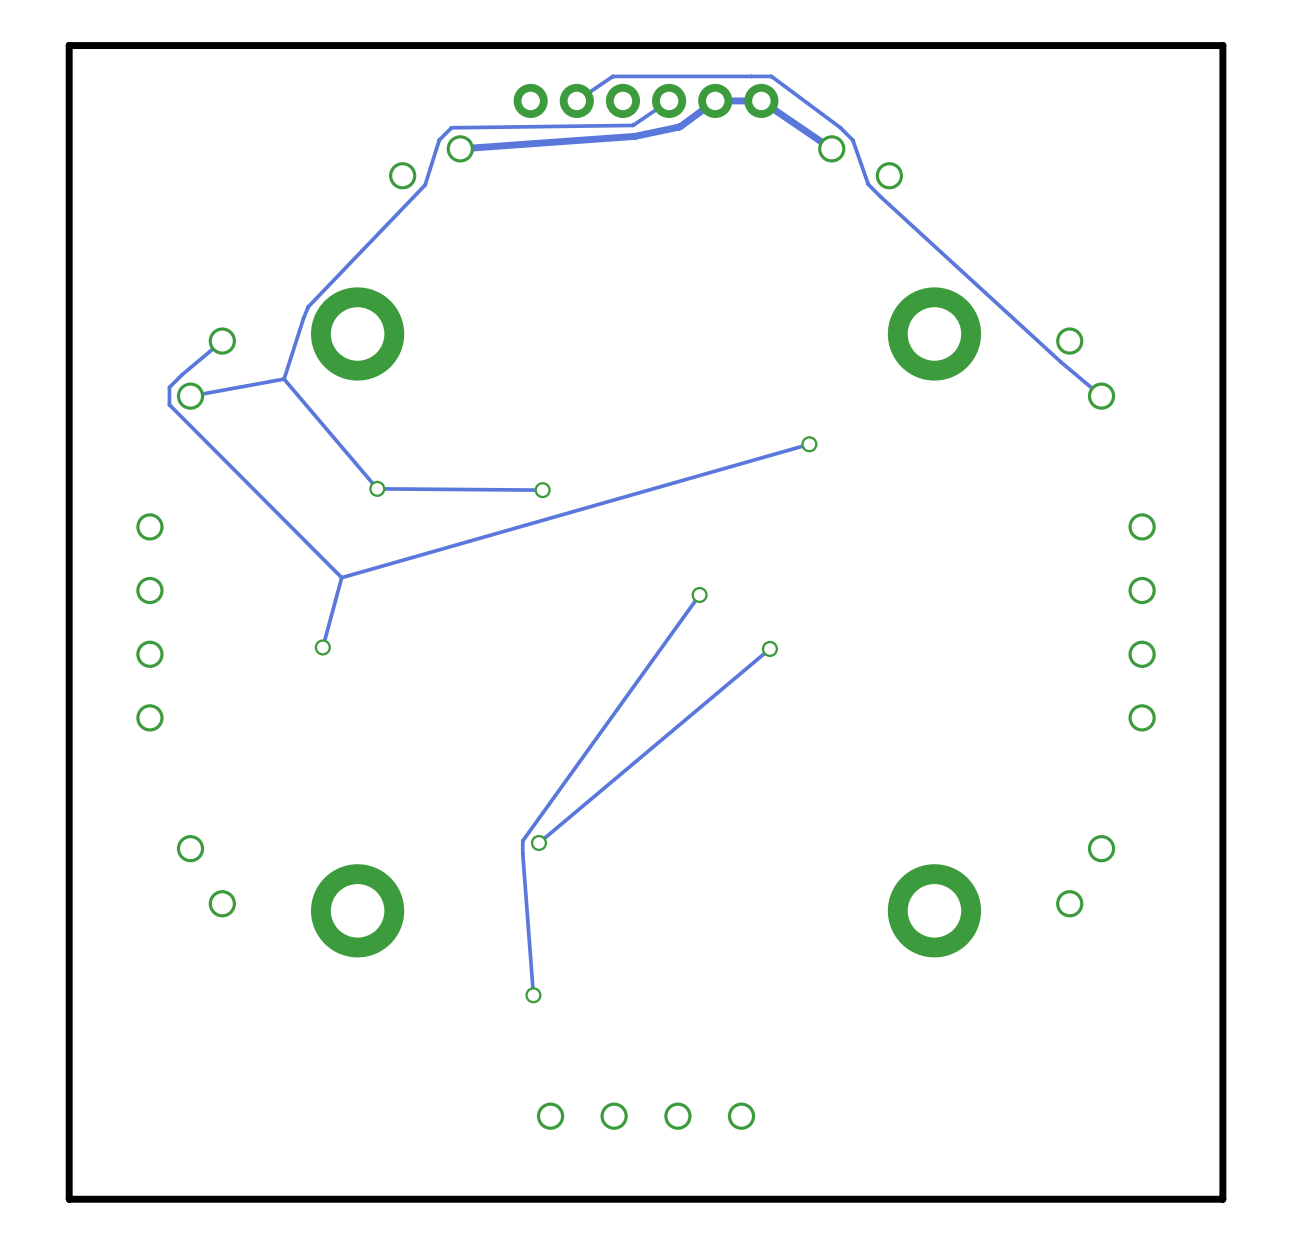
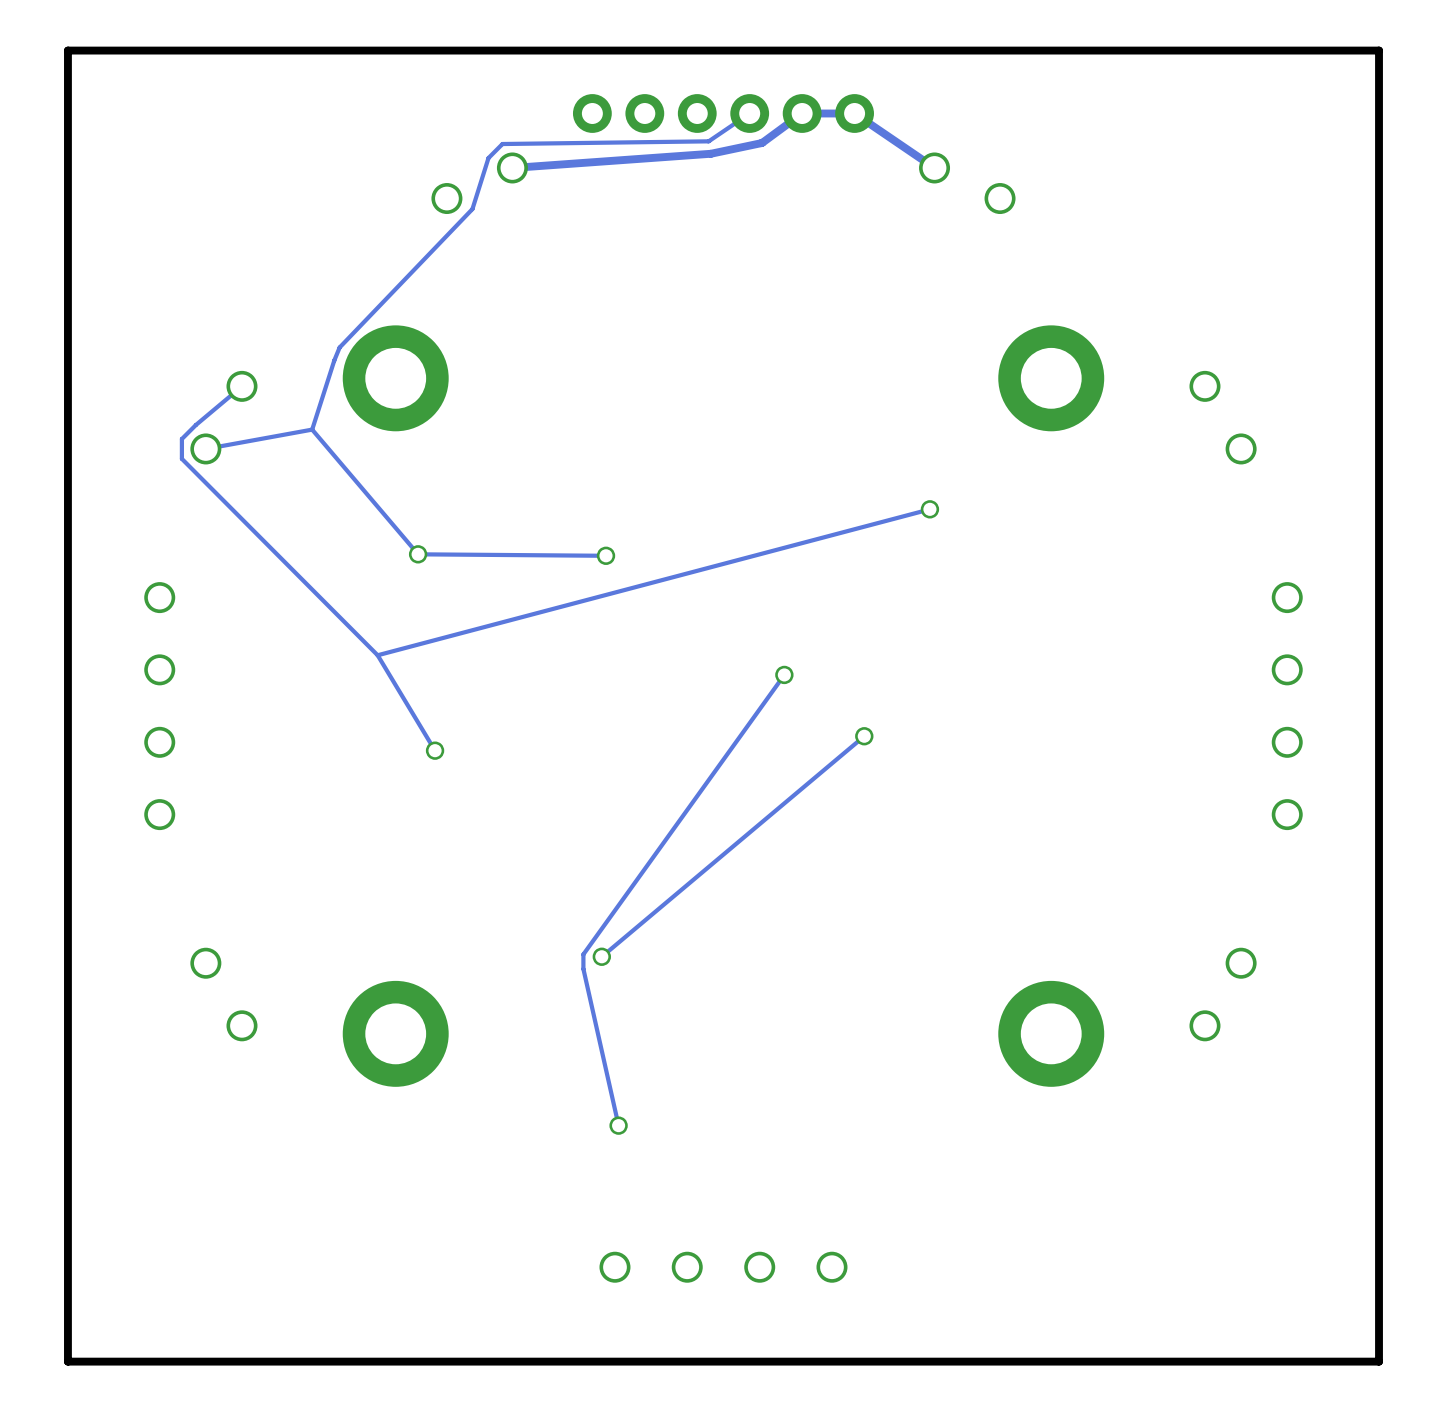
track: (576, 100) (613, 76) (771, 76) (840, 127) (852, 140) (868, 184) (1060, 362) (1101, 396) -> none
track: (809, 444) (341, 577) (322, 647) -> none
via position: (809, 444) -> (929, 509)
track: none -> (929, 509) (377, 655) (435, 750)
via position: (322, 647) -> (435, 750)
track: (522, 853) (533, 995) -> (583, 968) (618, 1125)
via position: (533, 995) -> (618, 1125)

